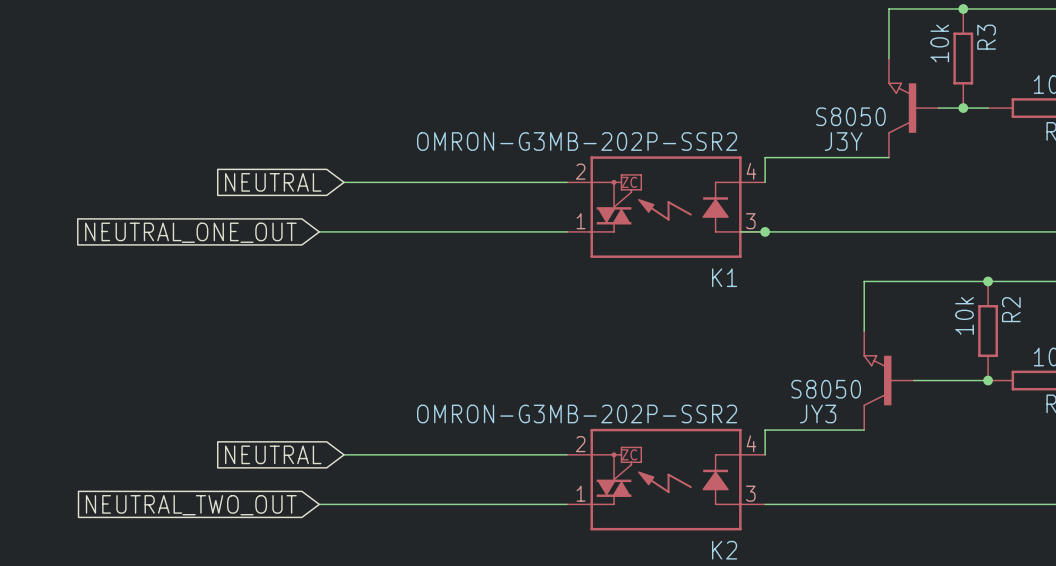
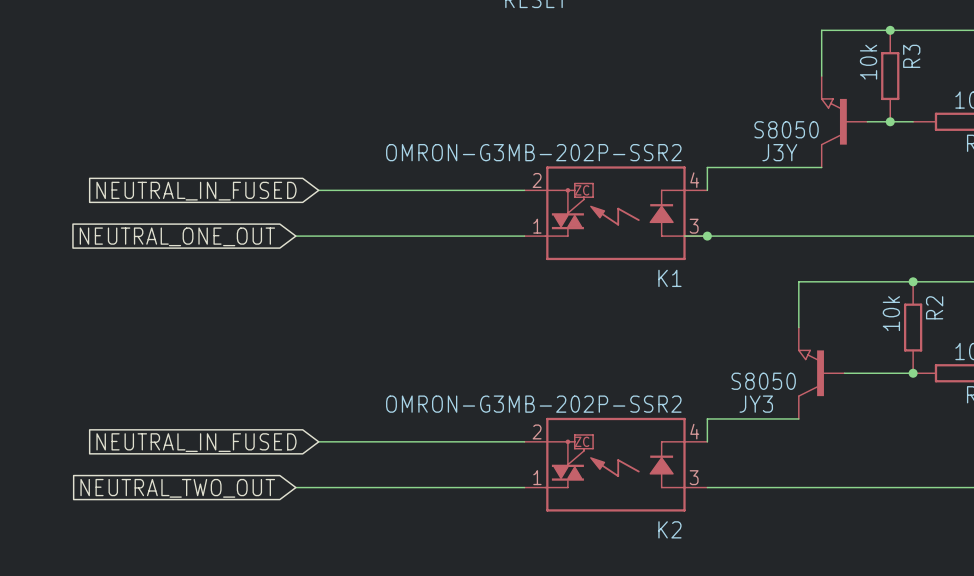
global label: NEUTRAL (273, 182) -> NEUTRAL_IN_FUSED (196, 191)
global label: NEUTRAL (273, 454) -> NEUTRAL_IN_FUSED (196, 442)

